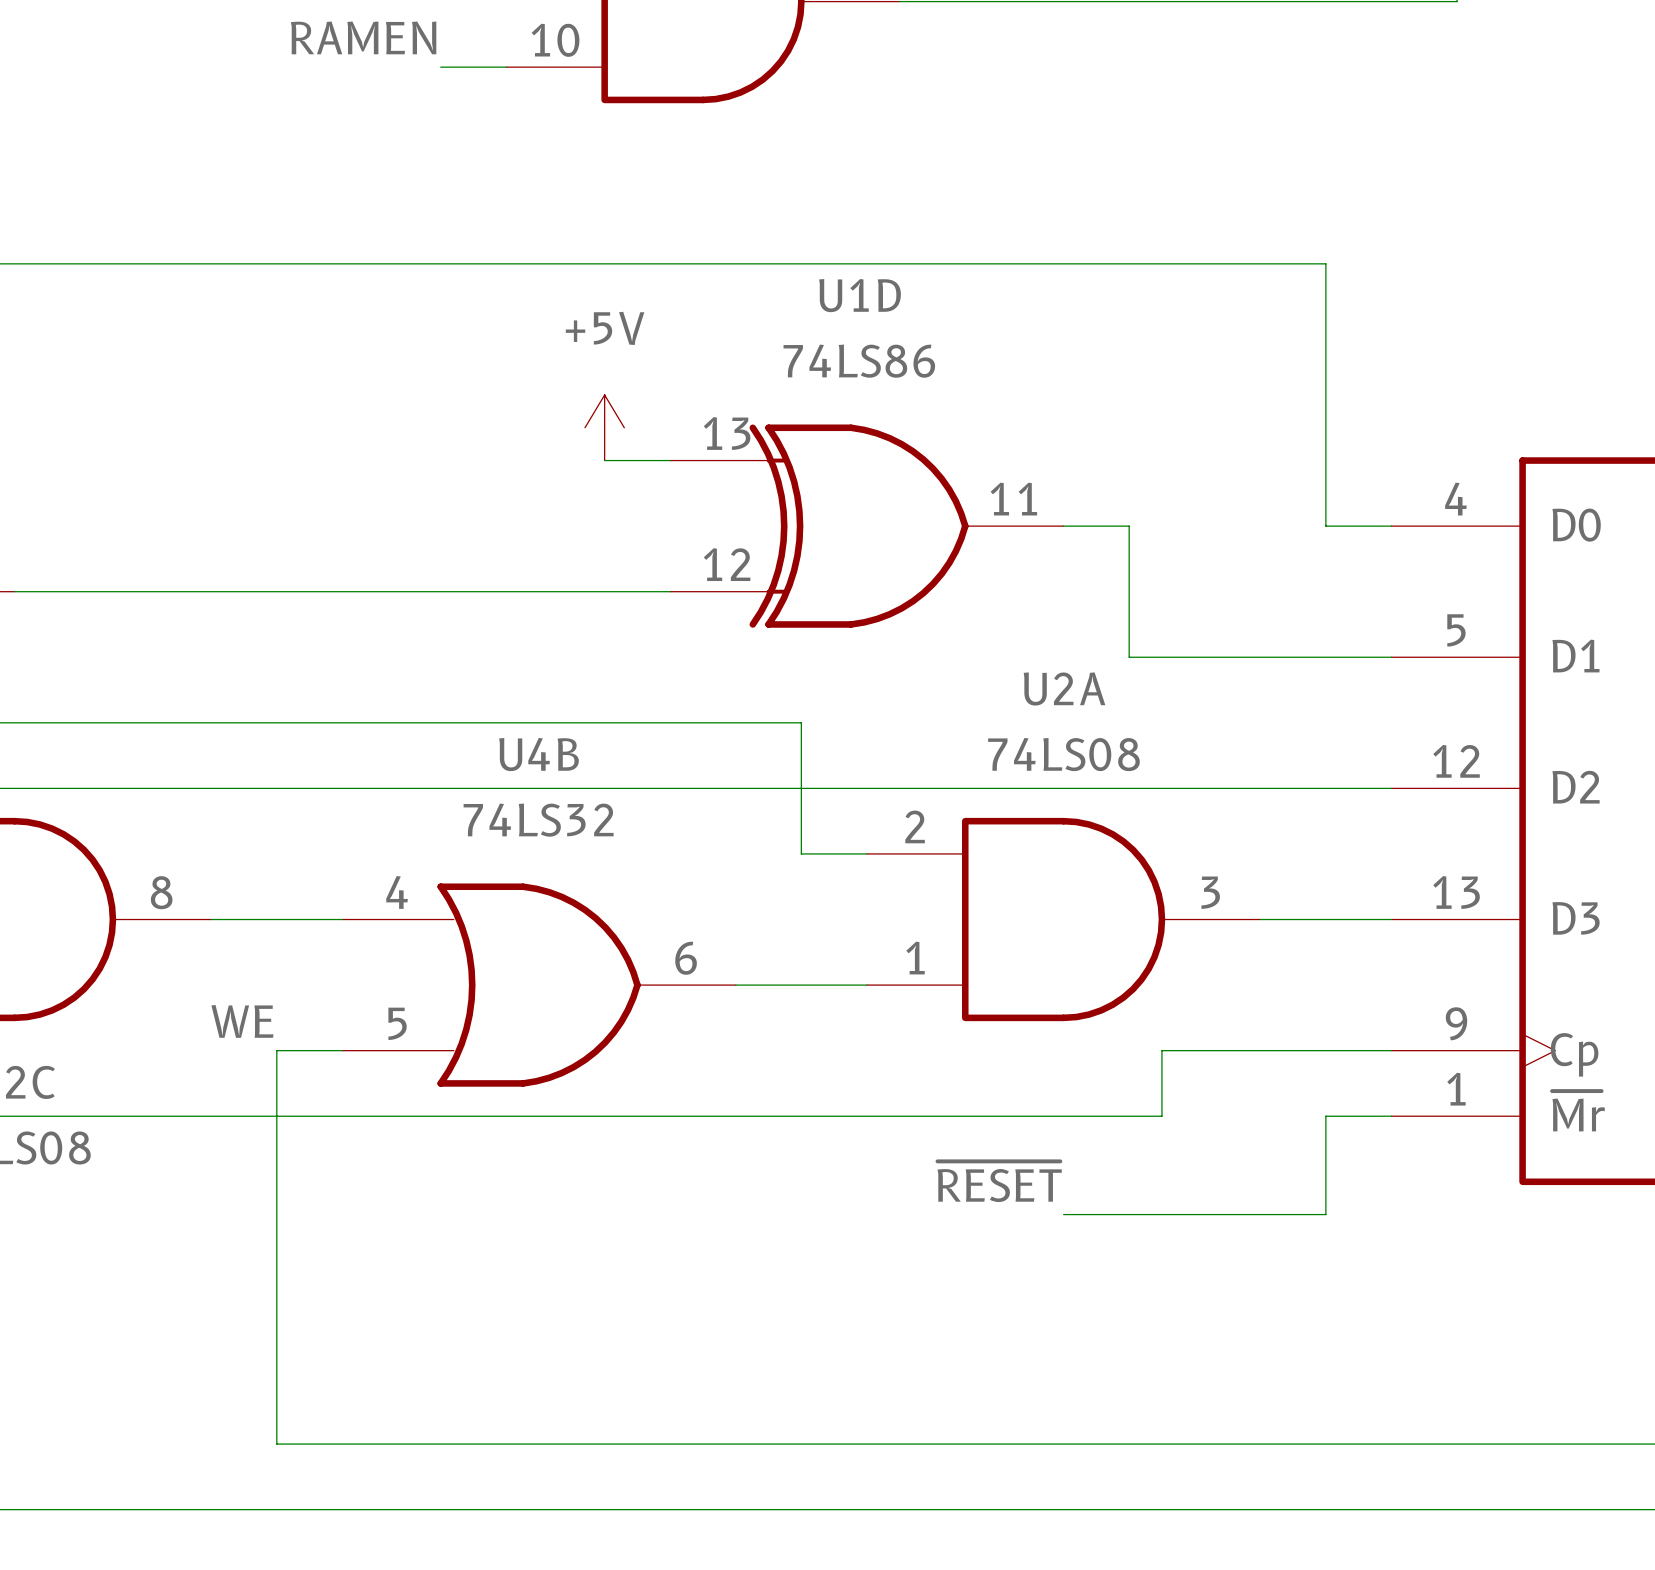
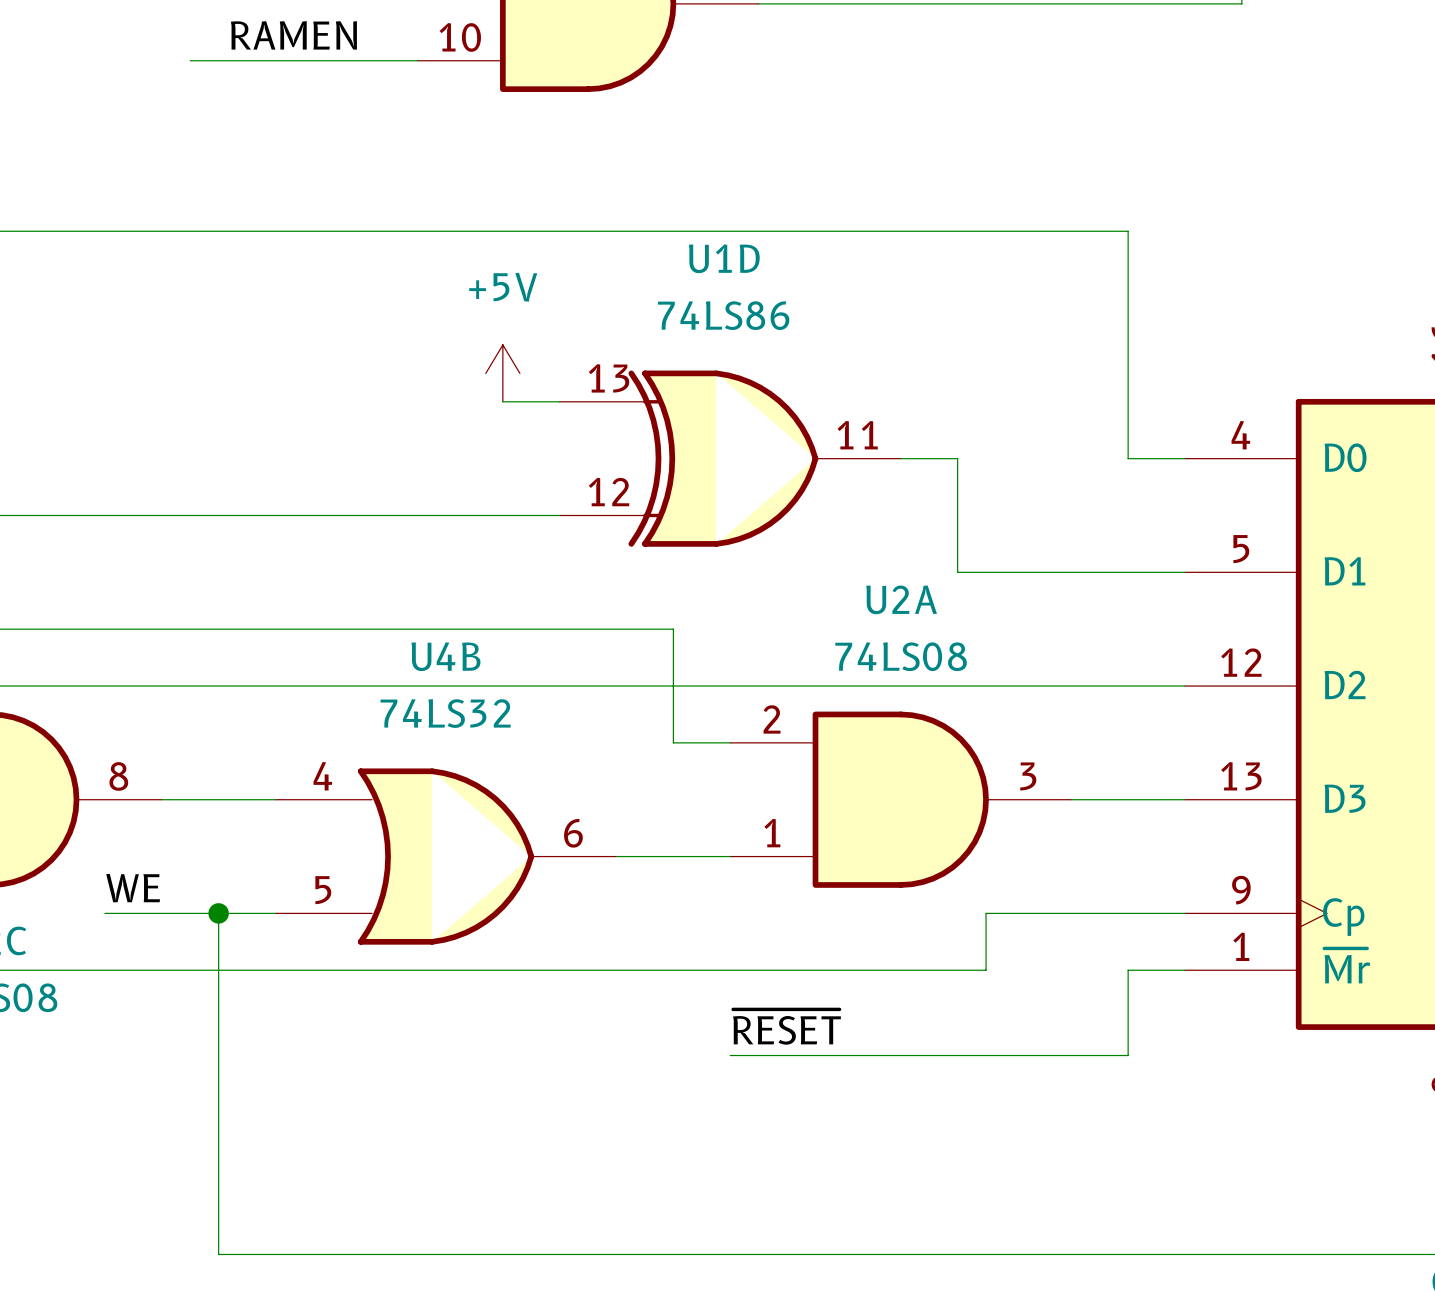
wire: none -> (190, 60) (360, 60)
label position: WE (242, 1021) -> WE (133, 888)
wire: none -> (104, 913) (218, 913)
junction: none -> (218, 913)
label position: ~{RESET} (999, 1181) -> ~{RESET} (786, 1027)
wire: none -> (730, 1055) (900, 1055)

